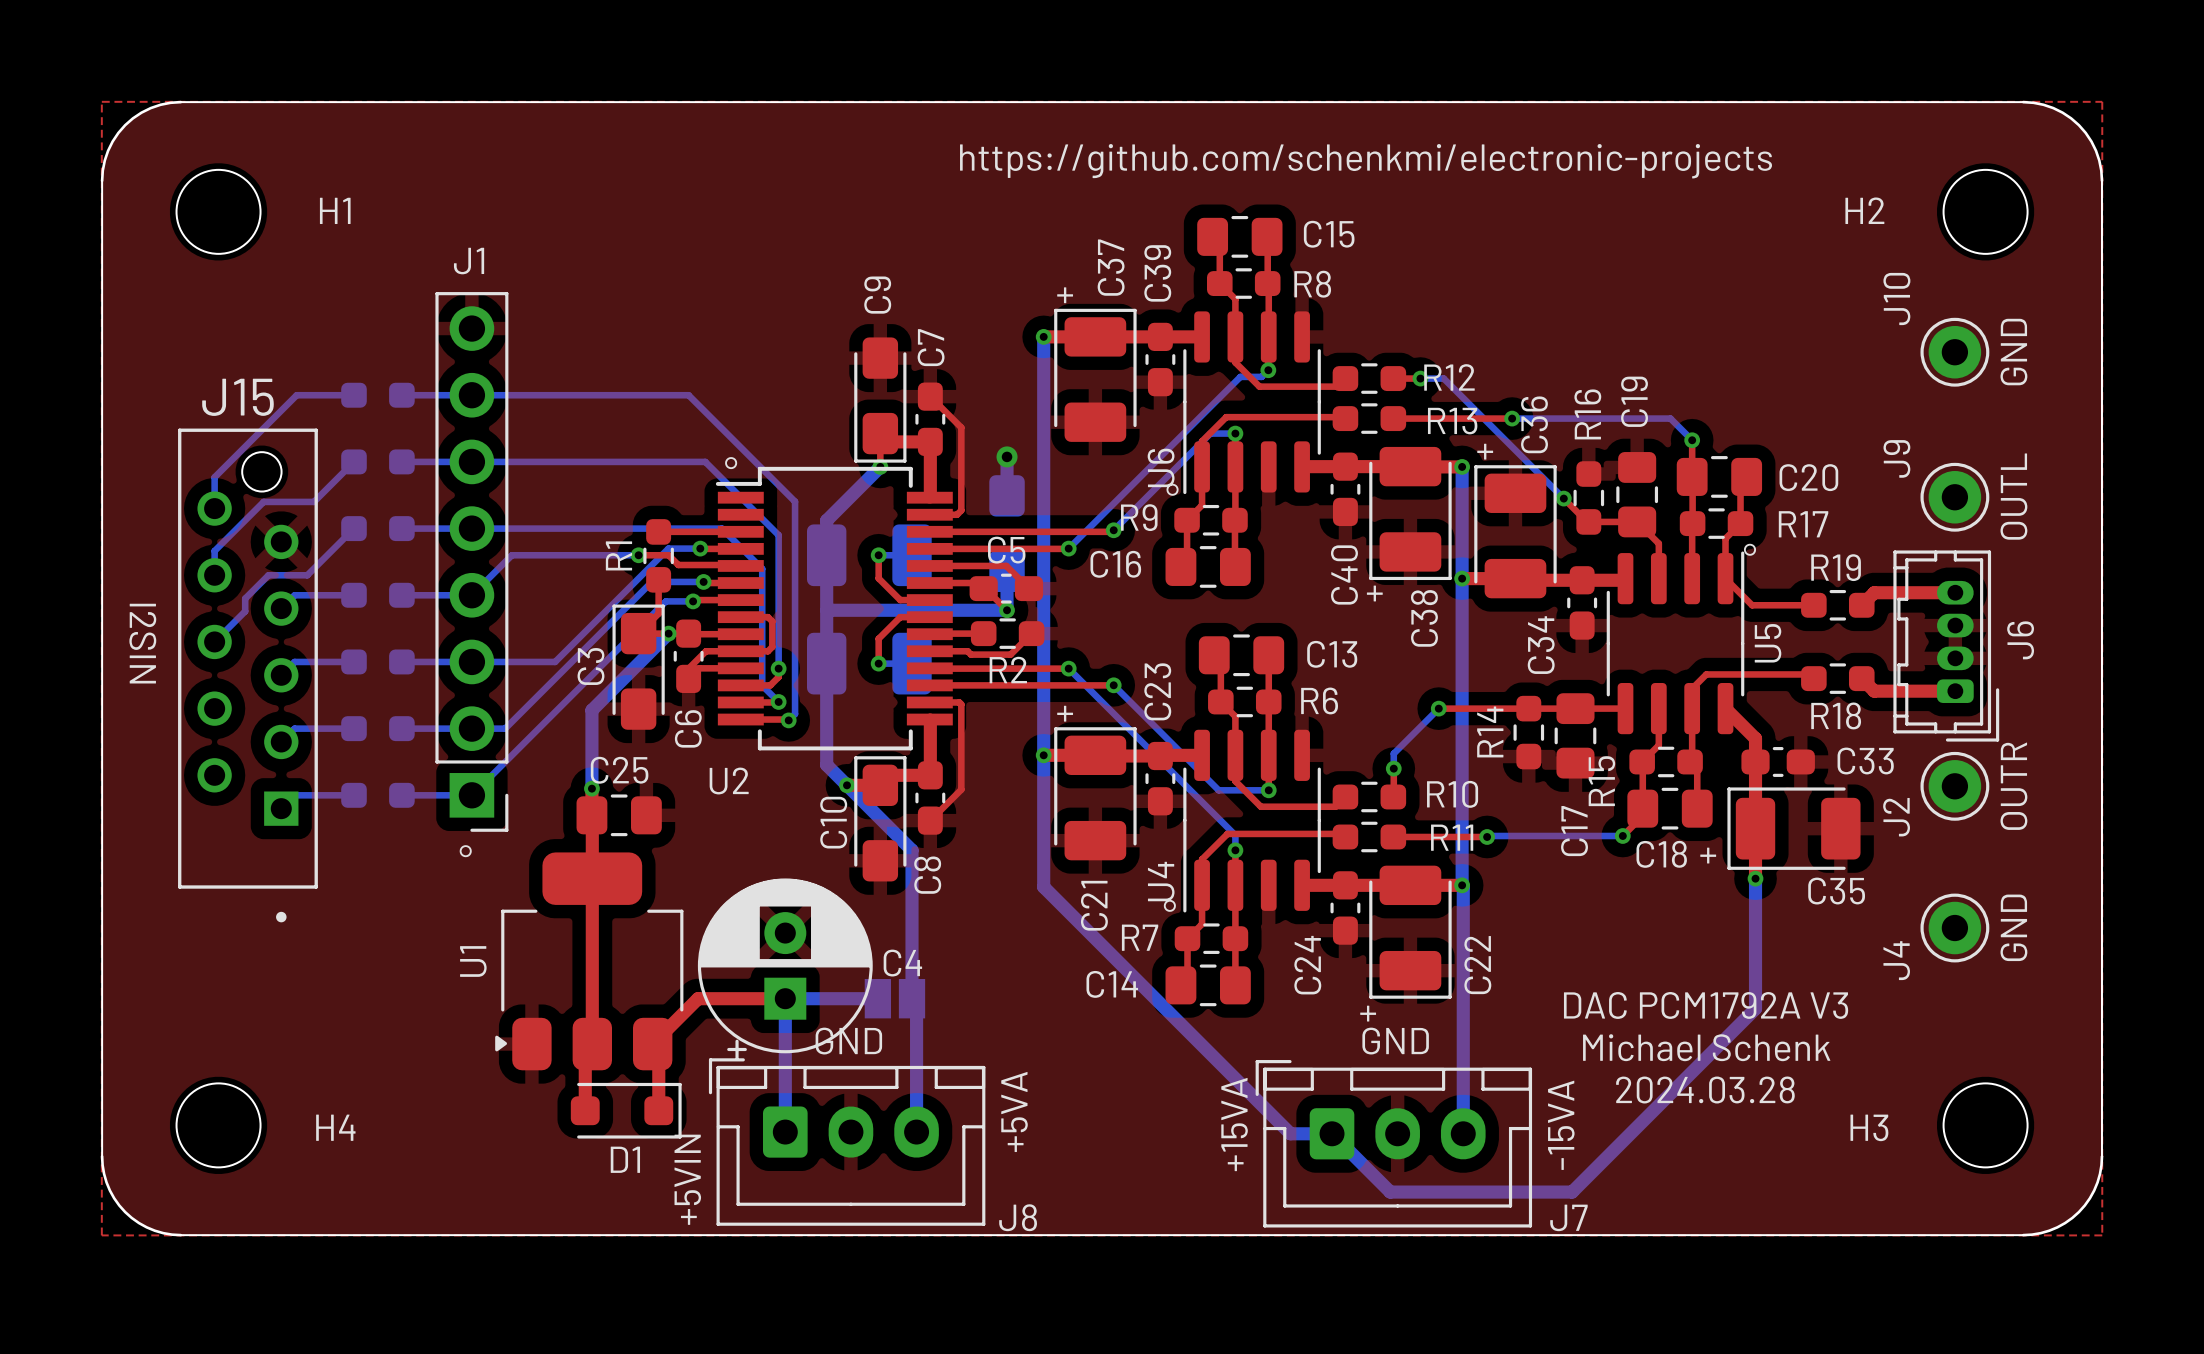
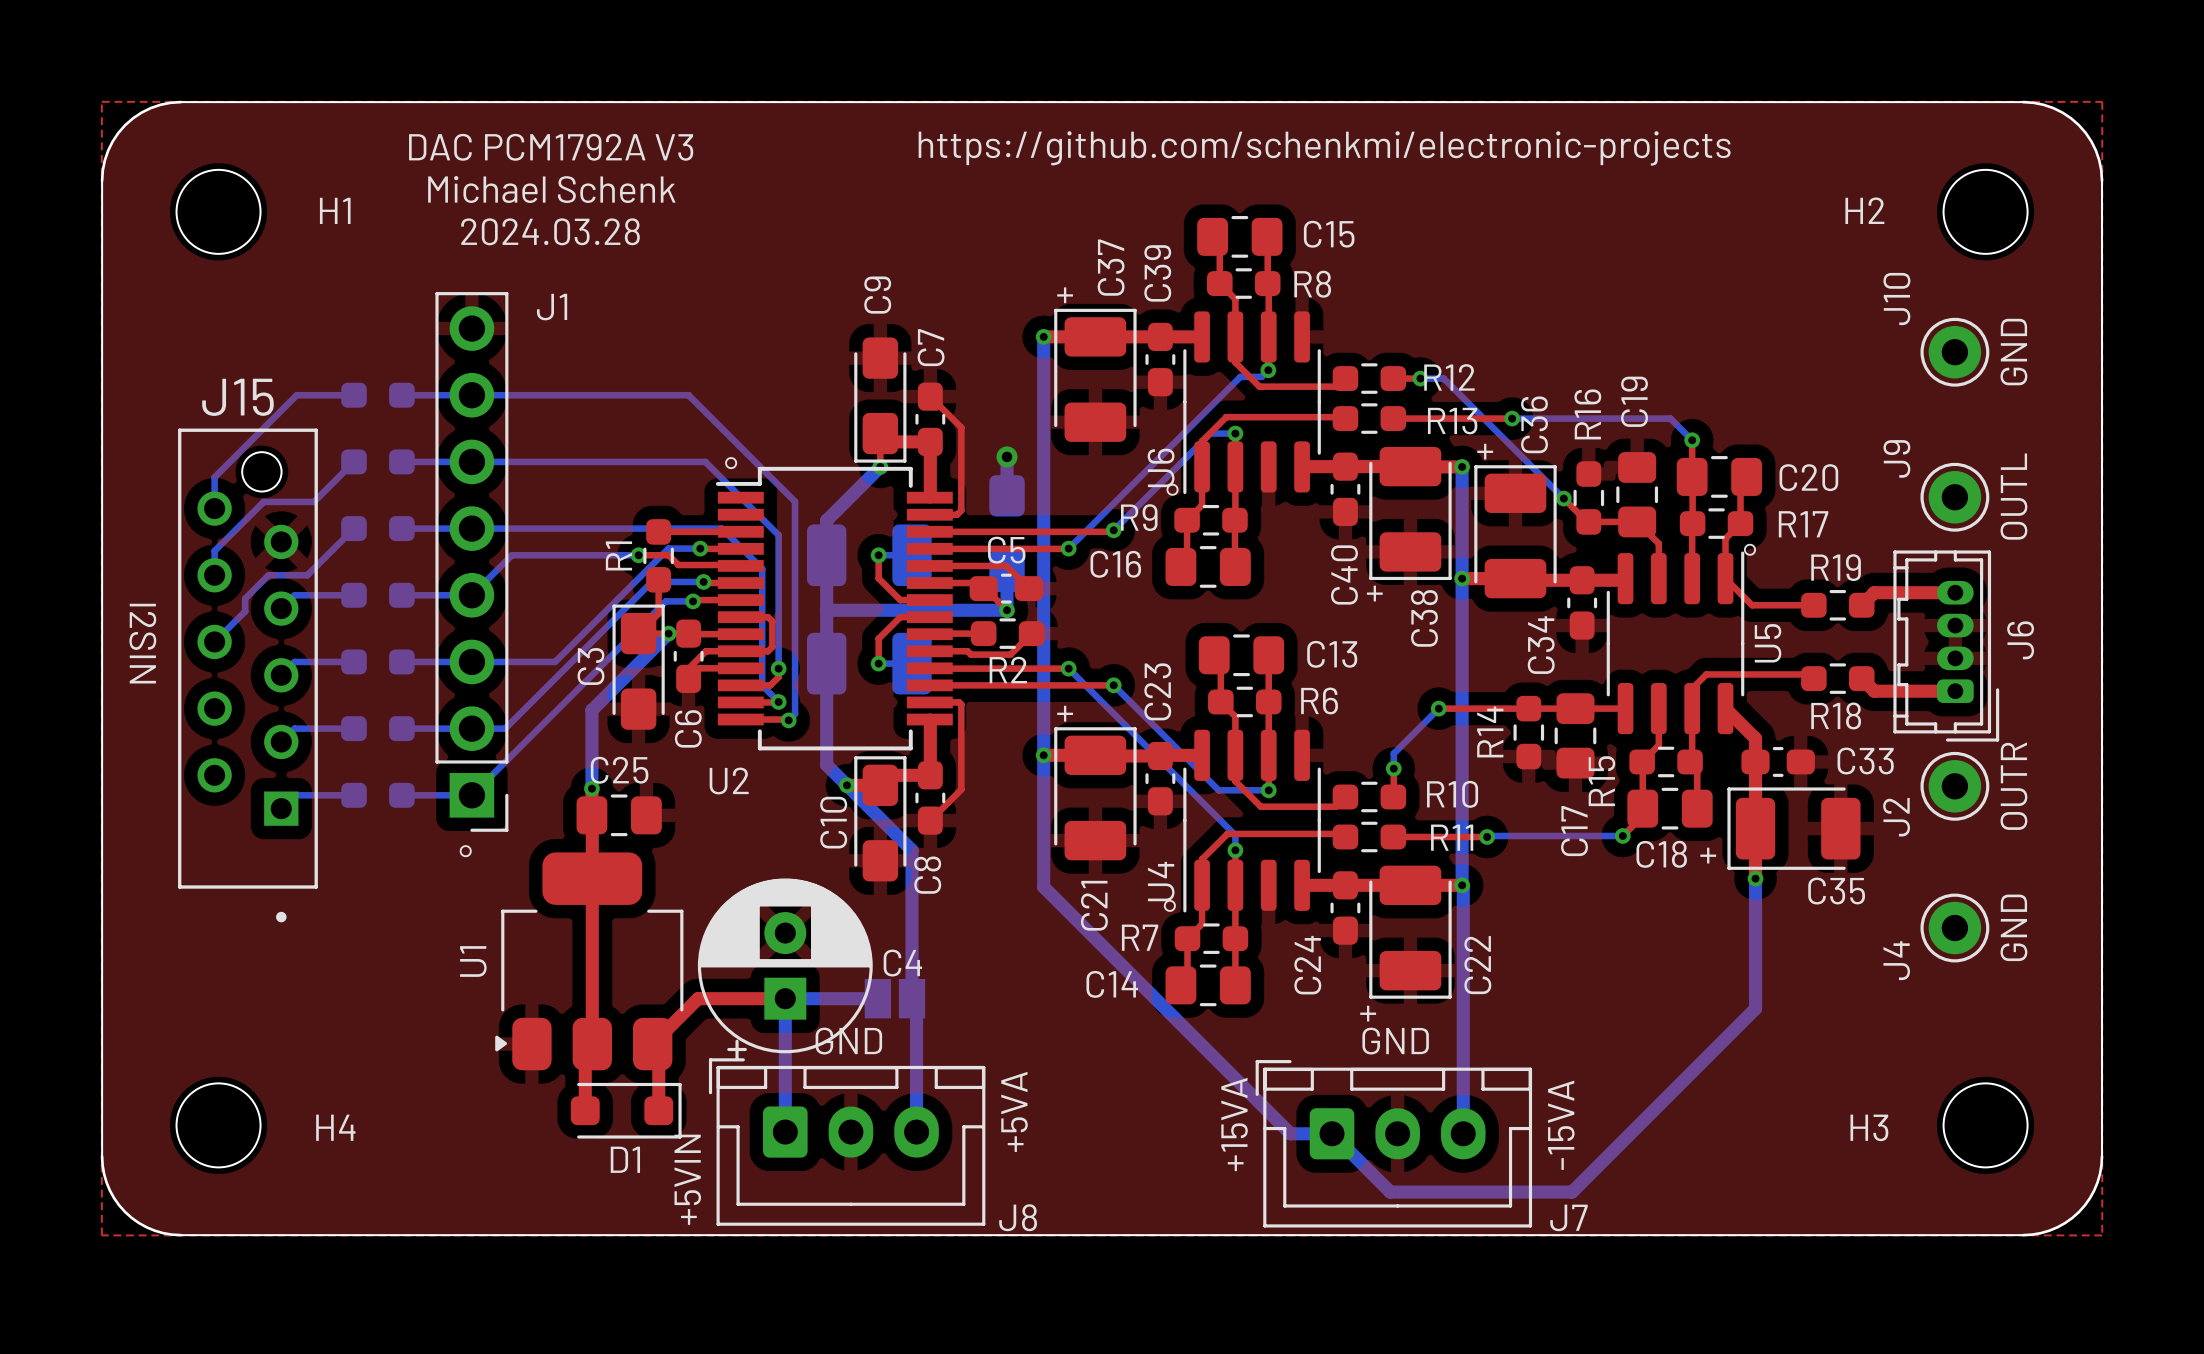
text: none -> DAC PCM1792A V3 (551, 147)
text position: https://github.com/schenkmi/electronic-projects (1366, 161) -> https://github.com/schenkmi/electronic-projects (1324, 148)
text: none -> Michael Schenk (551, 189)
text: none -> 2024.03.28 (550, 231)
J1 name position: J1 (469, 261) -> J1 (552, 307)
text: DAC PCM1792A V3 (1706, 1005) -> none
text: Michael Schenk (1706, 1047) -> none
text: 2024.03.28 (1705, 1089) -> none

